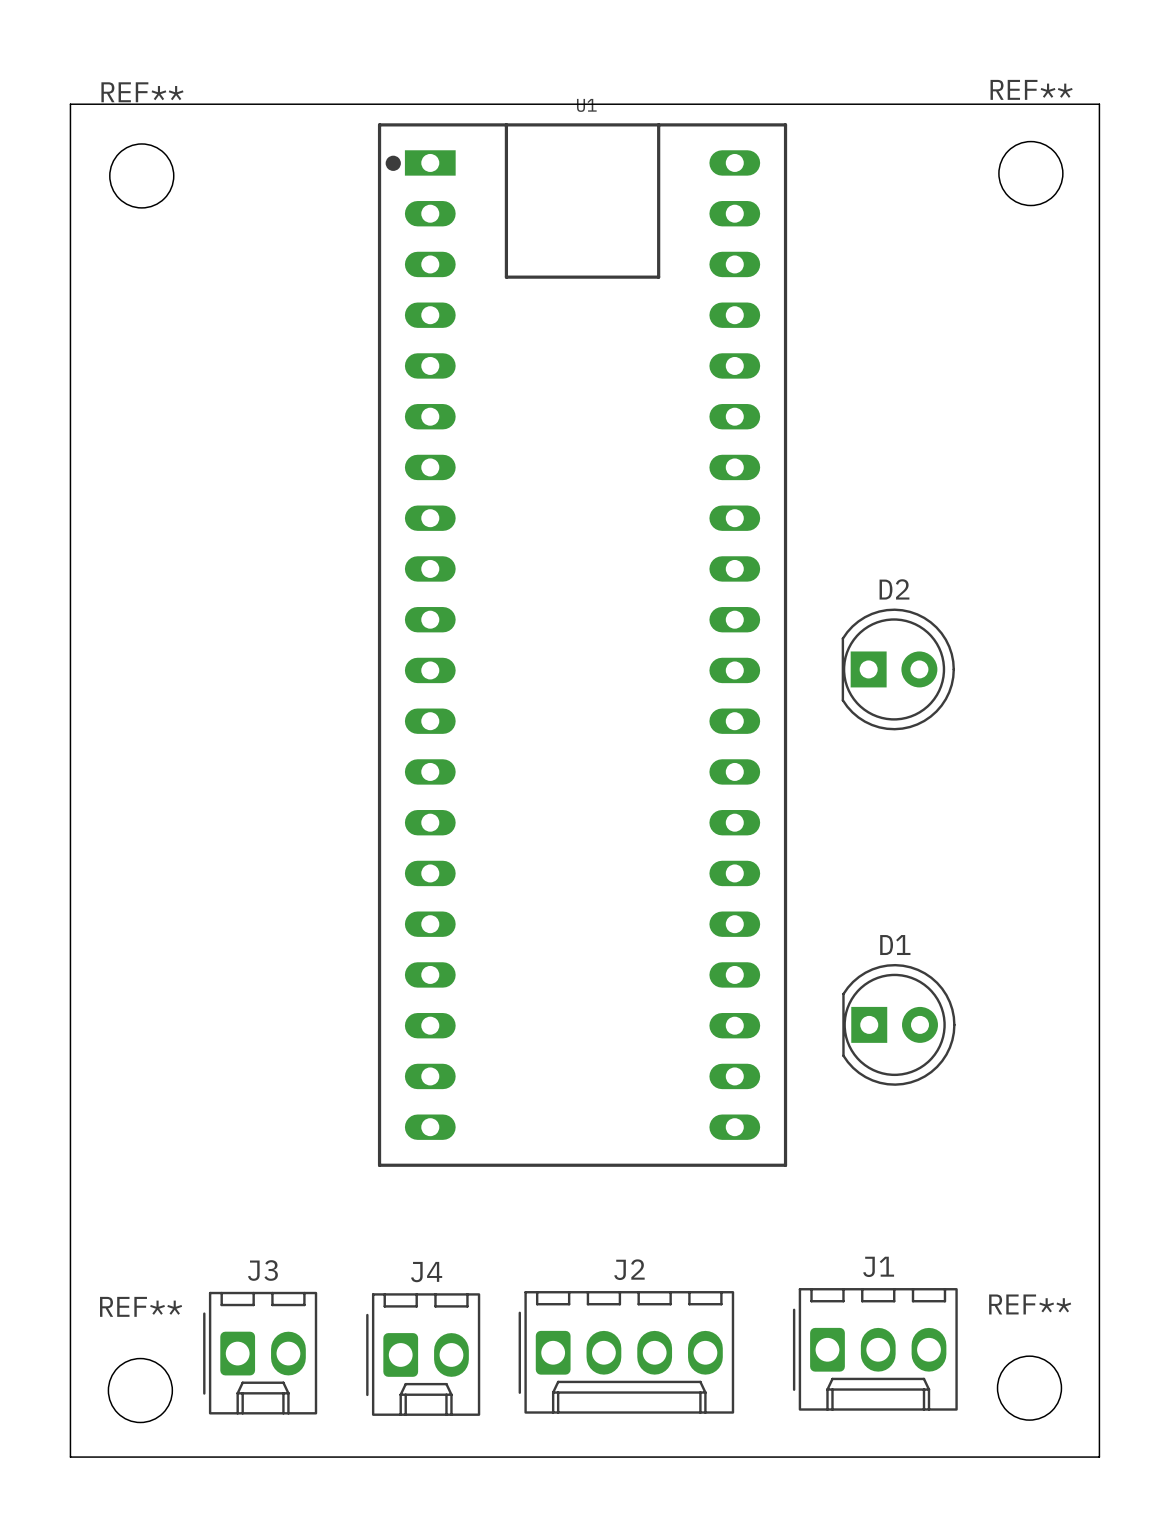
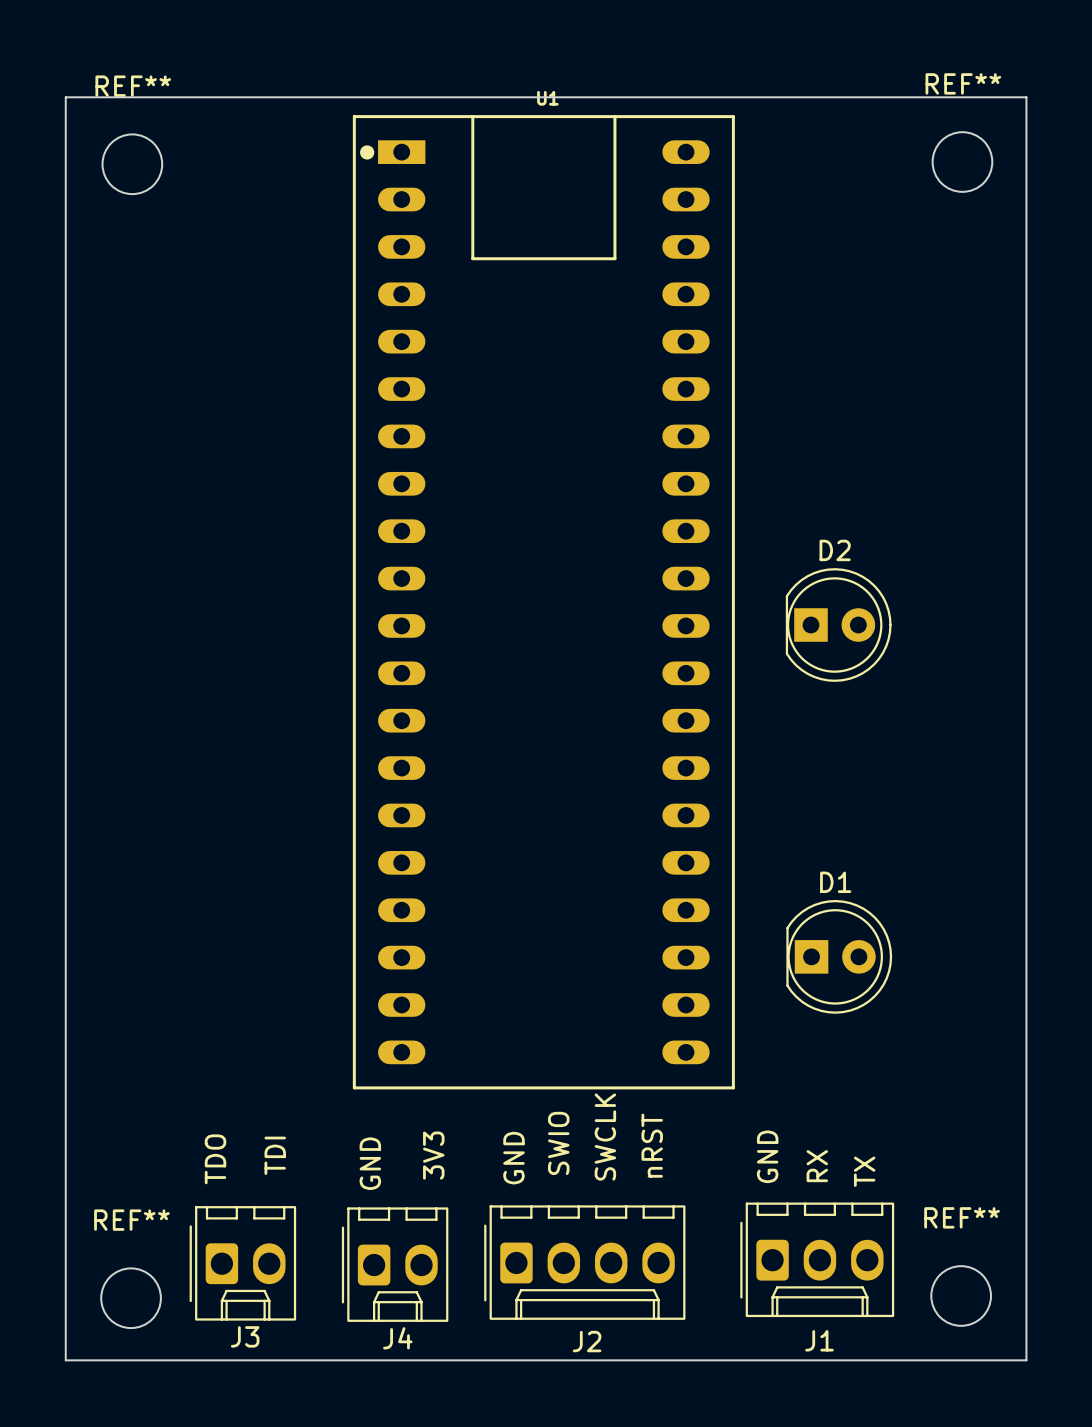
text: none -> SWCLK (605, 1137)
text: none -> SWIO (558, 1143)
text: none -> nRST (652, 1145)
text: none -> TDI (275, 1155)
text: none -> 3V3 (433, 1155)
text: none -> TDO (215, 1159)
text: none -> GND (767, 1156)
text: none -> GND (513, 1158)
text: none -> GND (370, 1163)
text: none -> RX (817, 1166)
text: none -> TX (864, 1171)
J1 name position: J1 (878, 1266) -> J1 (819, 1340)
J2 name position: J2 (629, 1269) -> J2 (587, 1341)
J3 name position: J3 (262, 1270) -> J3 (245, 1336)
J4 name position: J4 (426, 1272) -> J4 (397, 1338)

